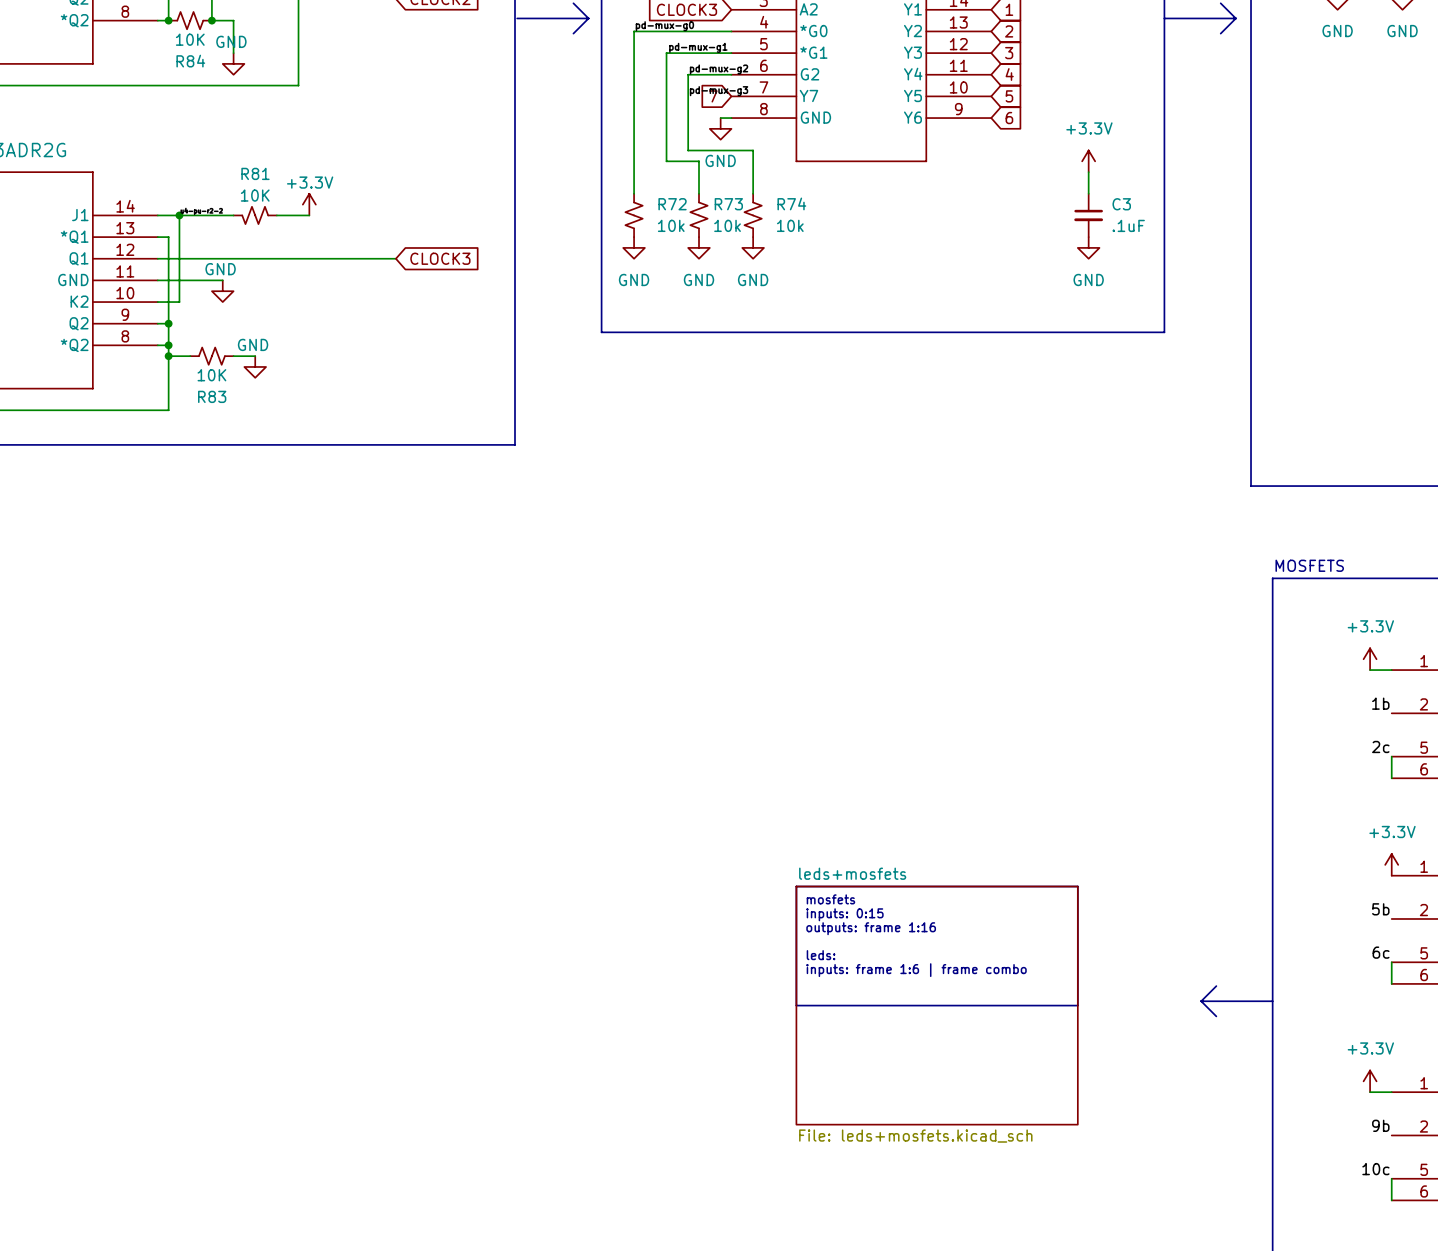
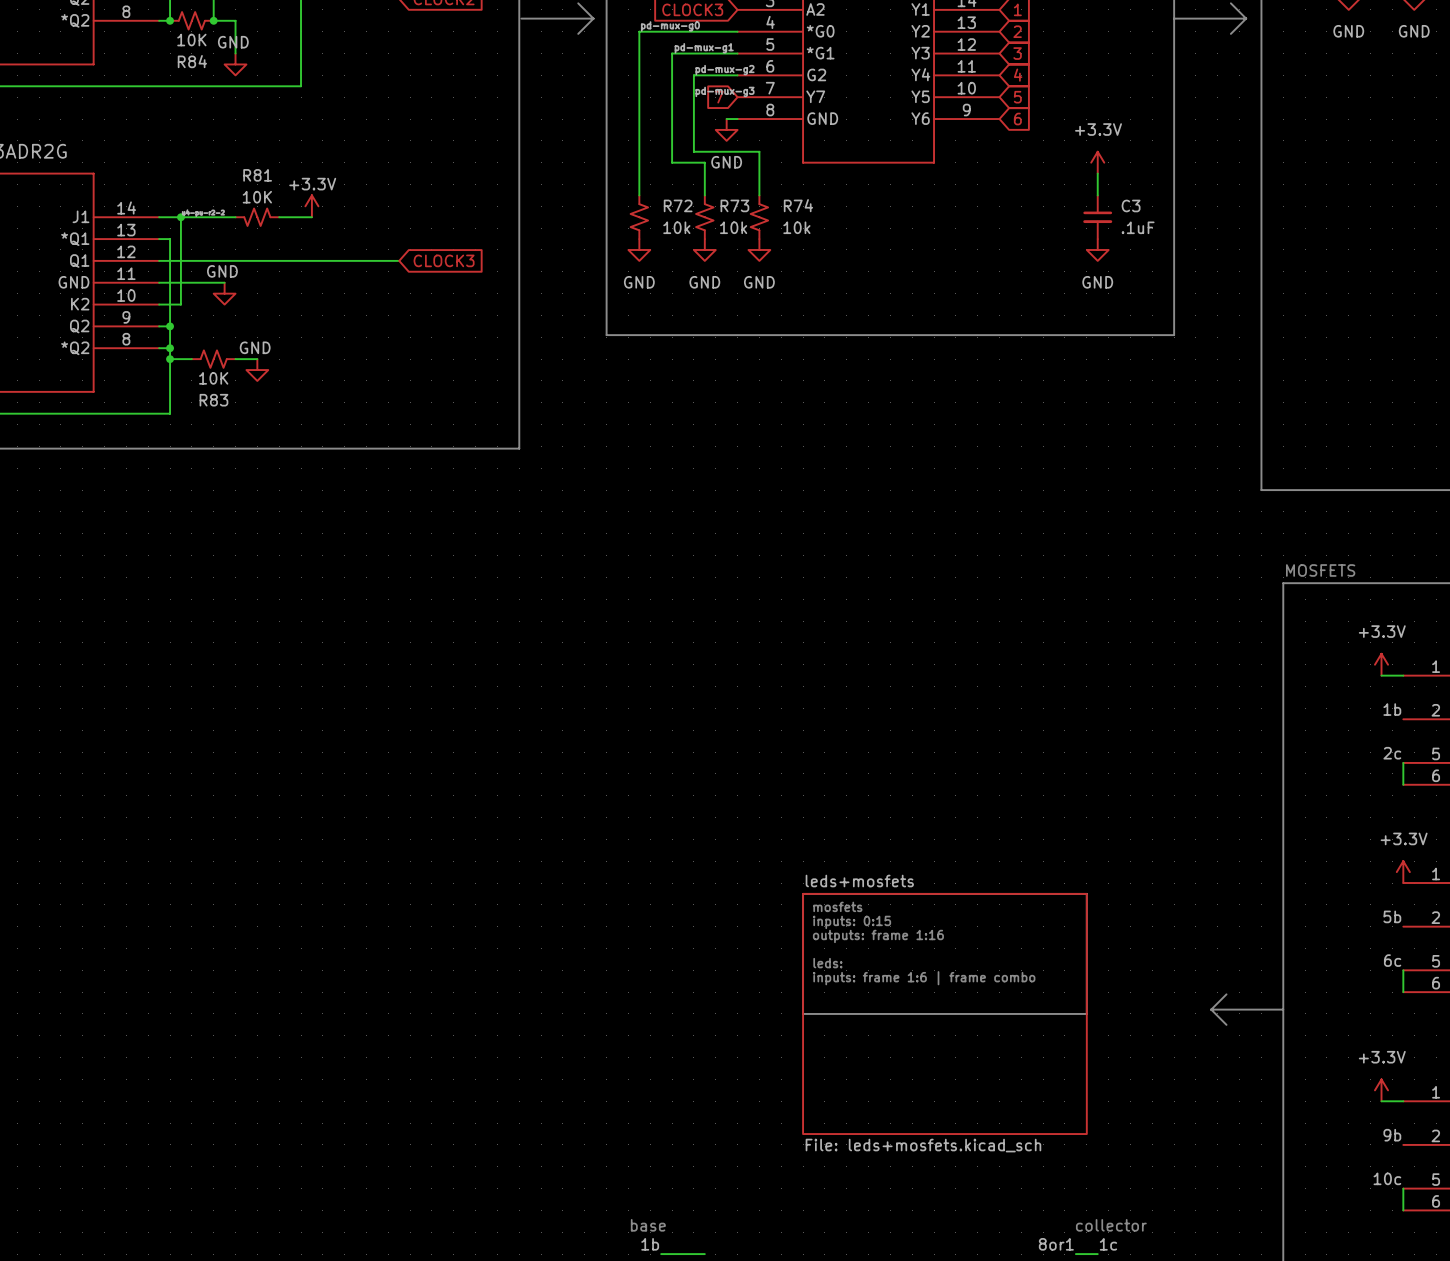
text: none -> base (648, 1225)
text: none -> collector (1111, 1225)
label: none -> 1b (650, 1244)
label: none -> 8or1 (1056, 1244)
label: none -> 1c (1108, 1244)
wire: none -> (661, 1254) (704, 1254)
wire: none -> (1075, 1254) (1097, 1254)

